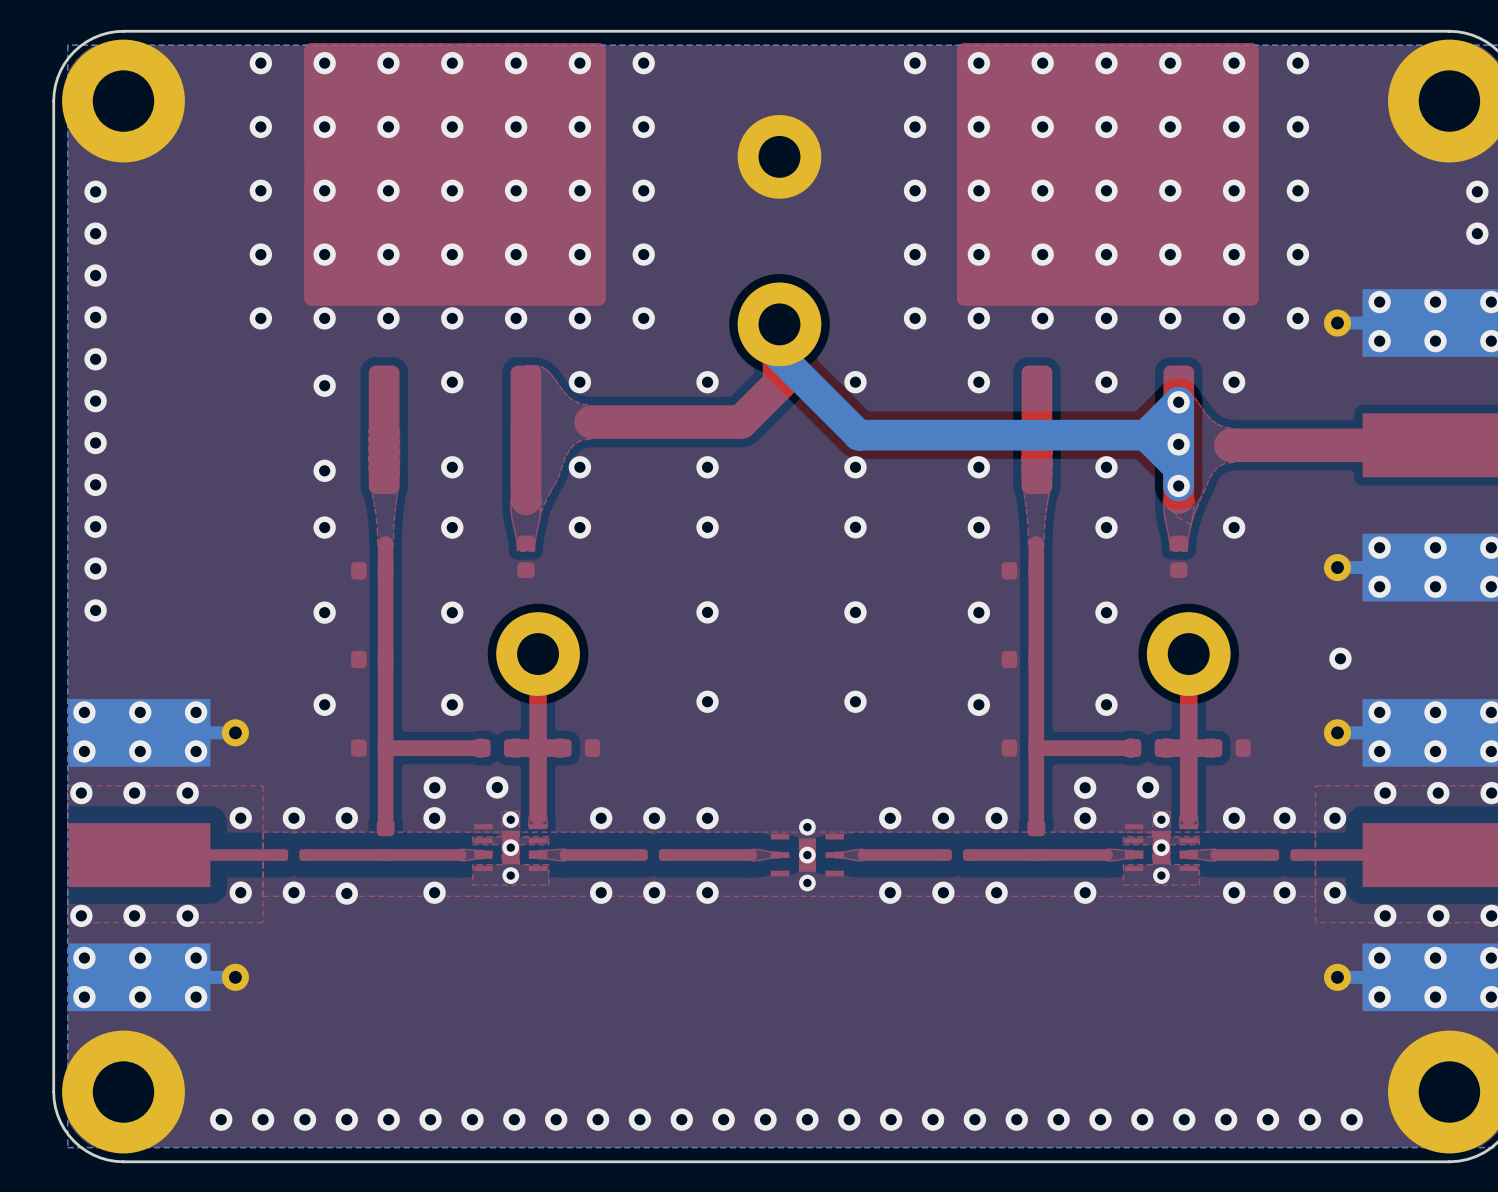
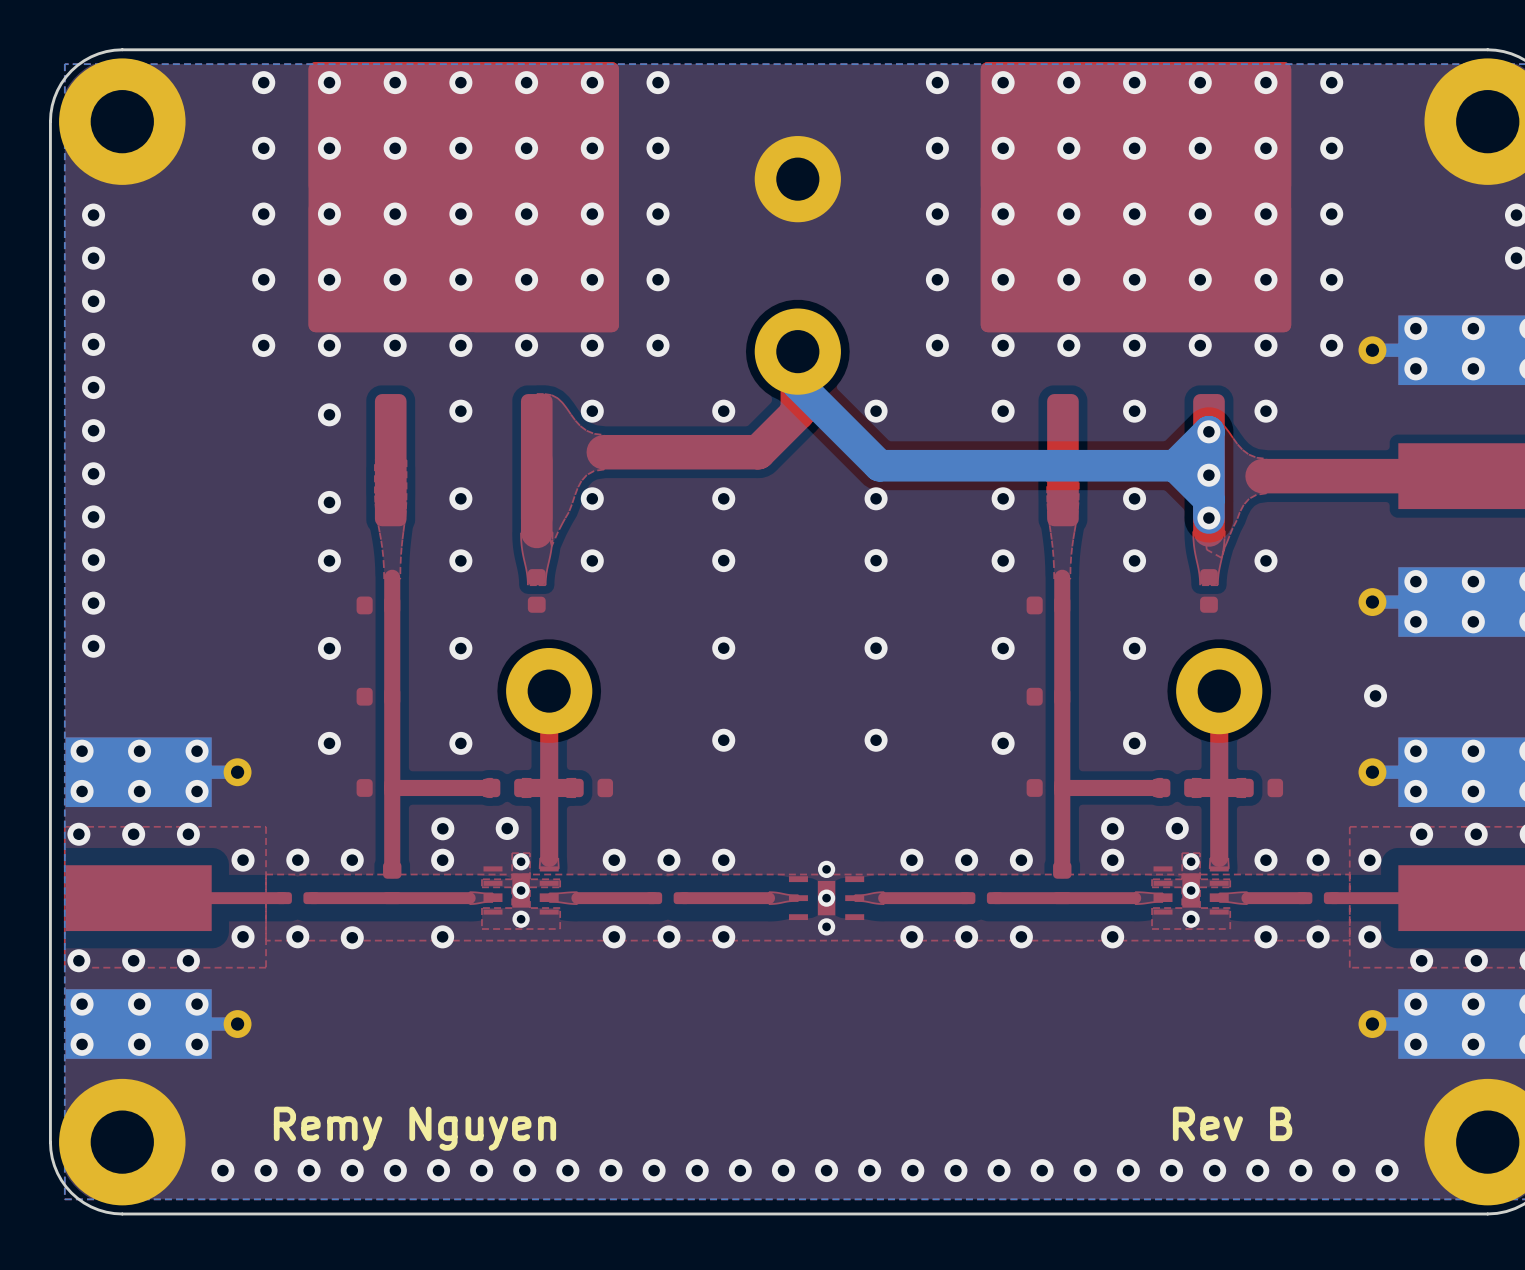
text: none -> Rev B (1232, 1123)
text: none -> Remy Nguyen (414, 1128)

